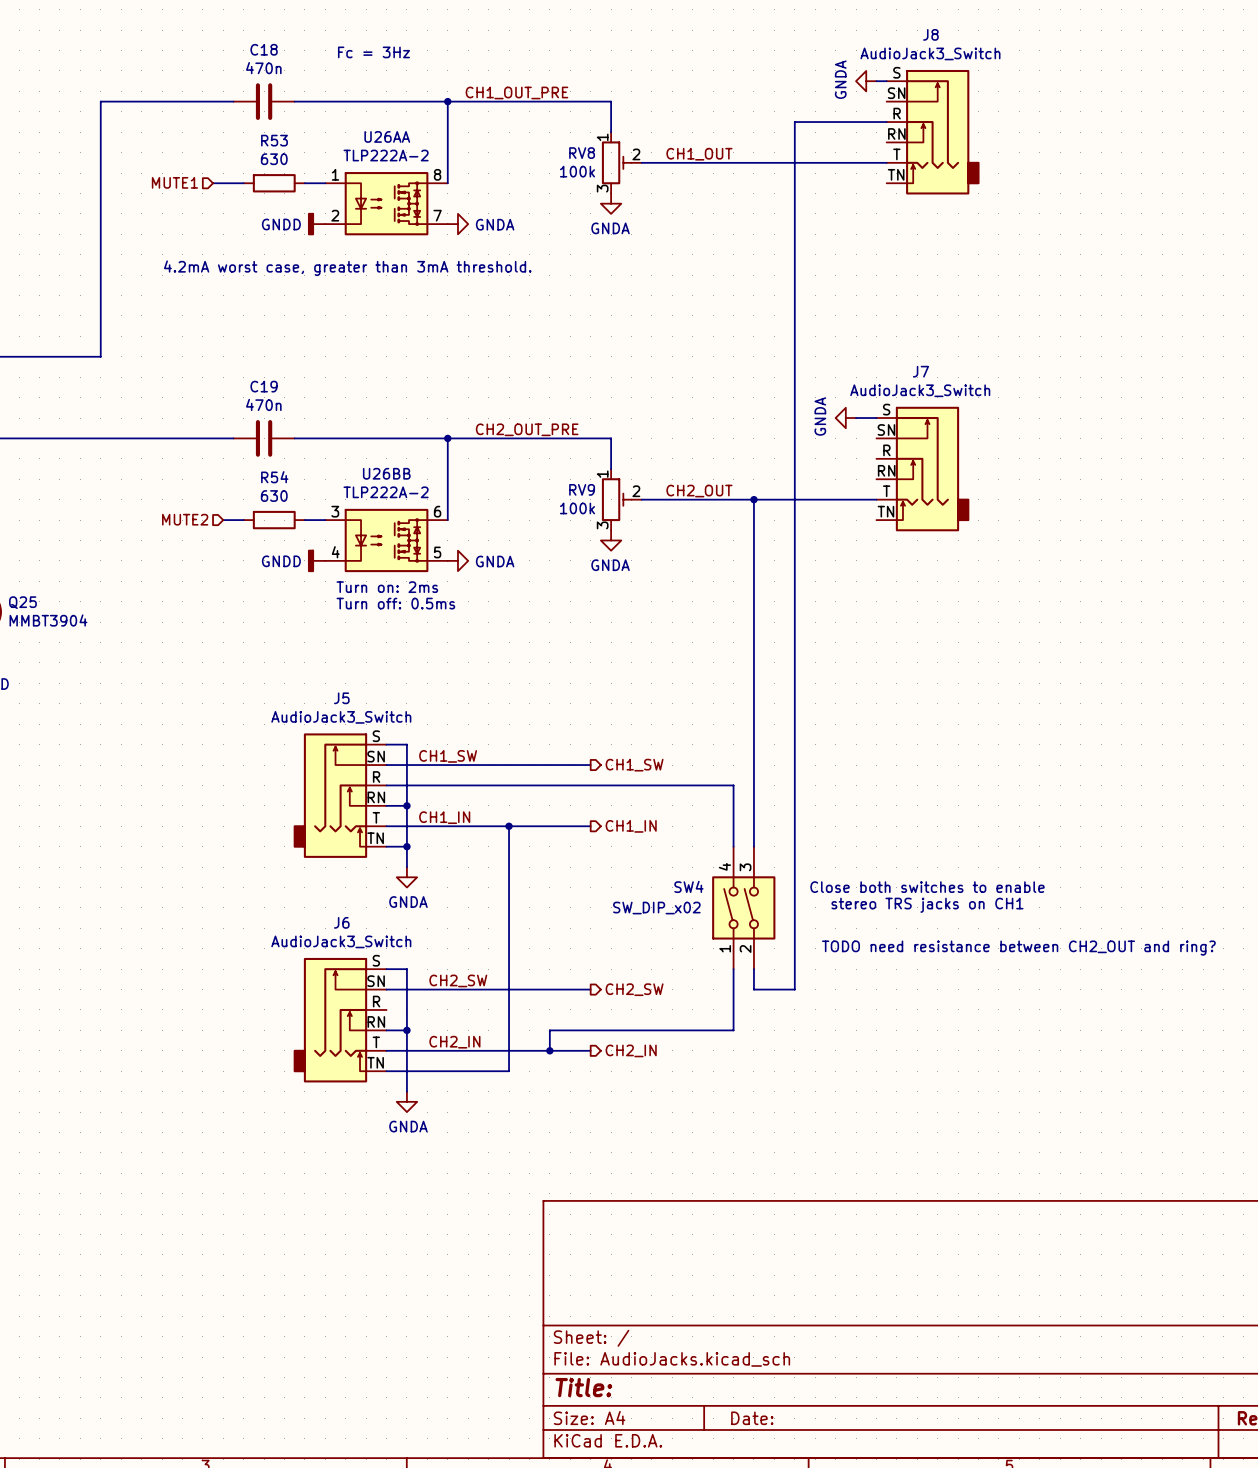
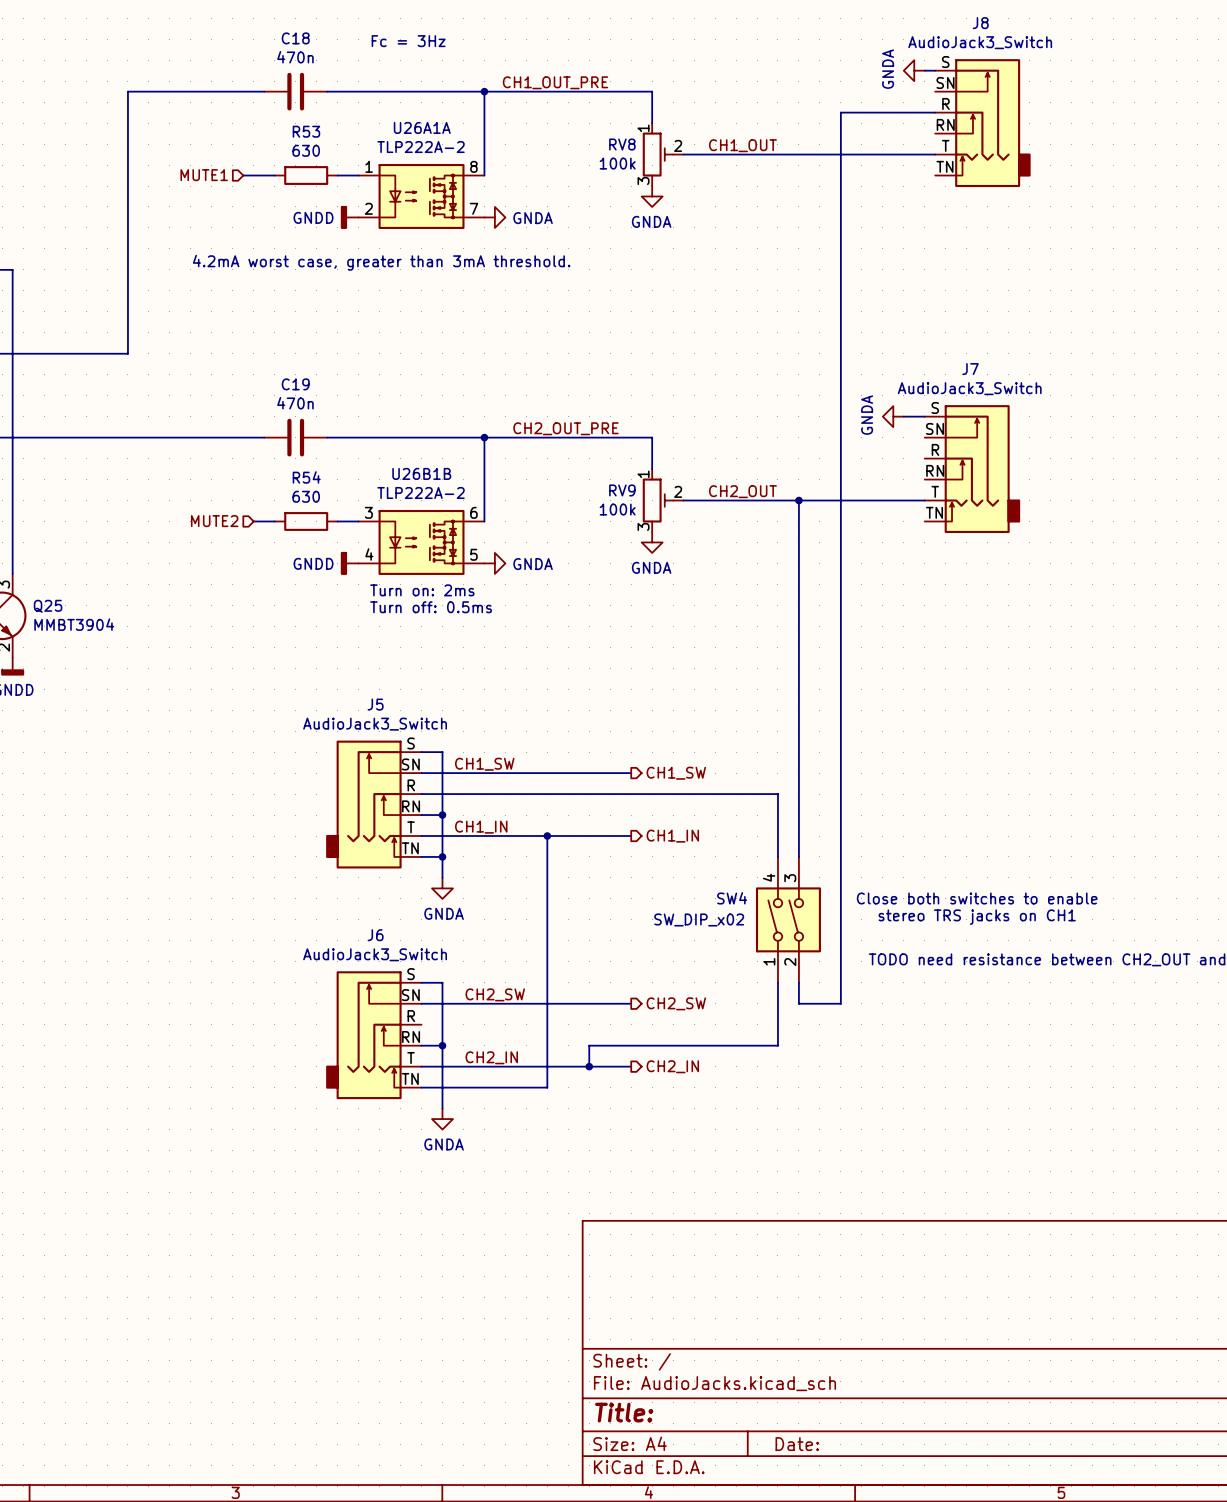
U26AA name: U26AA (387, 136) -> U26A1A (422, 127)
U26BB name: U26BB (386, 473) -> U26B1B (421, 473)

